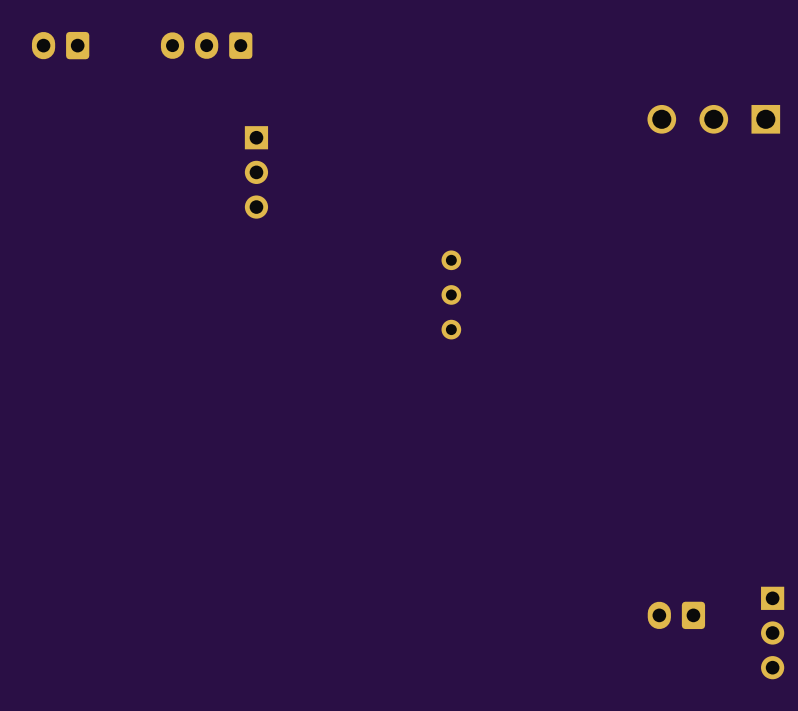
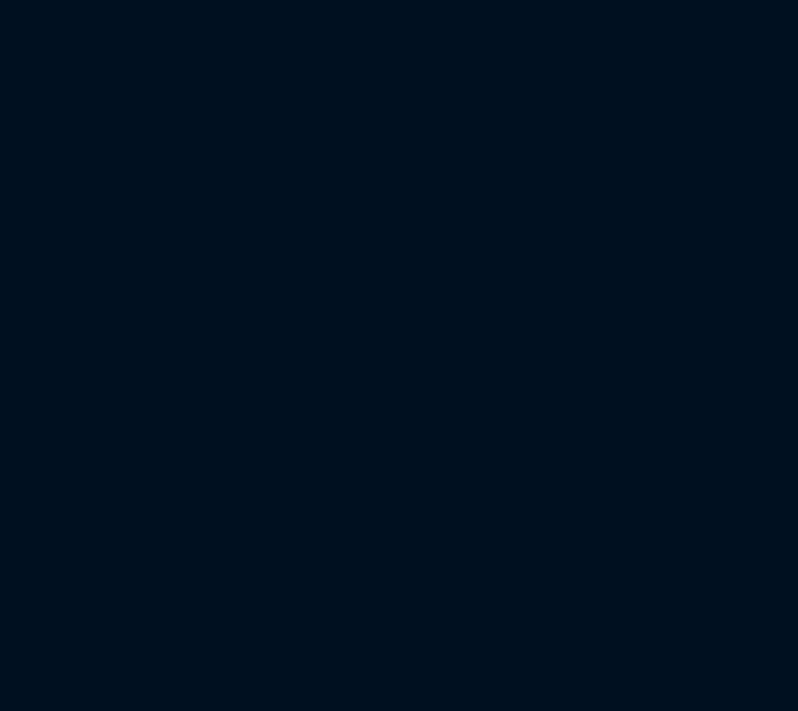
part: (60, 45) -> none
part: (206, 45) -> none
part: (713, 119) -> none
part: (256, 172) -> none
part: (451, 294) -> none
part: (676, 615) -> none
part: (772, 633) -> none

